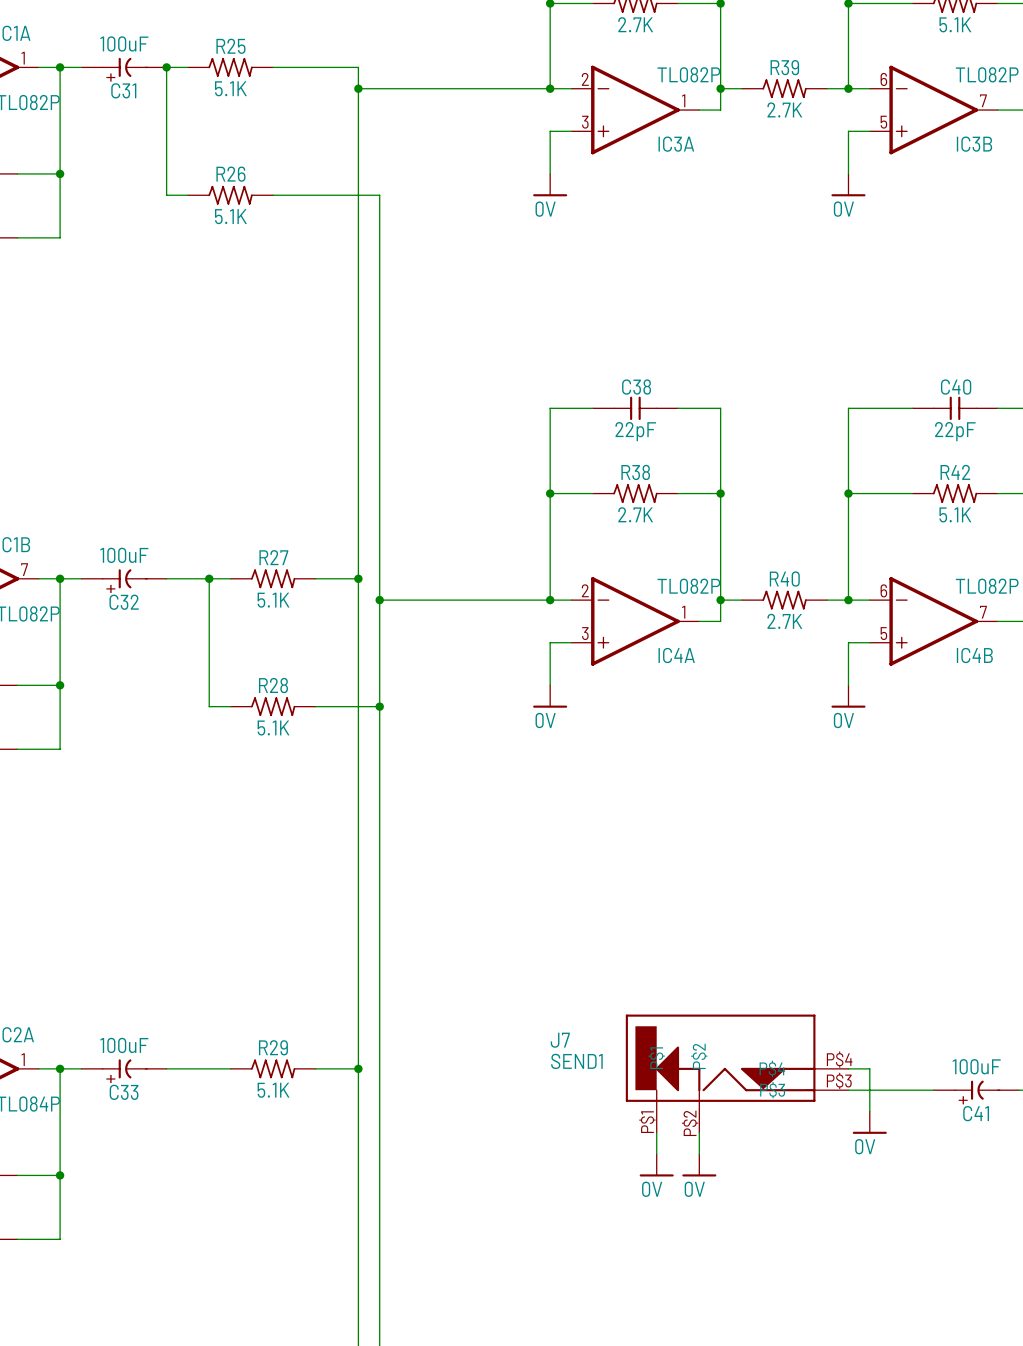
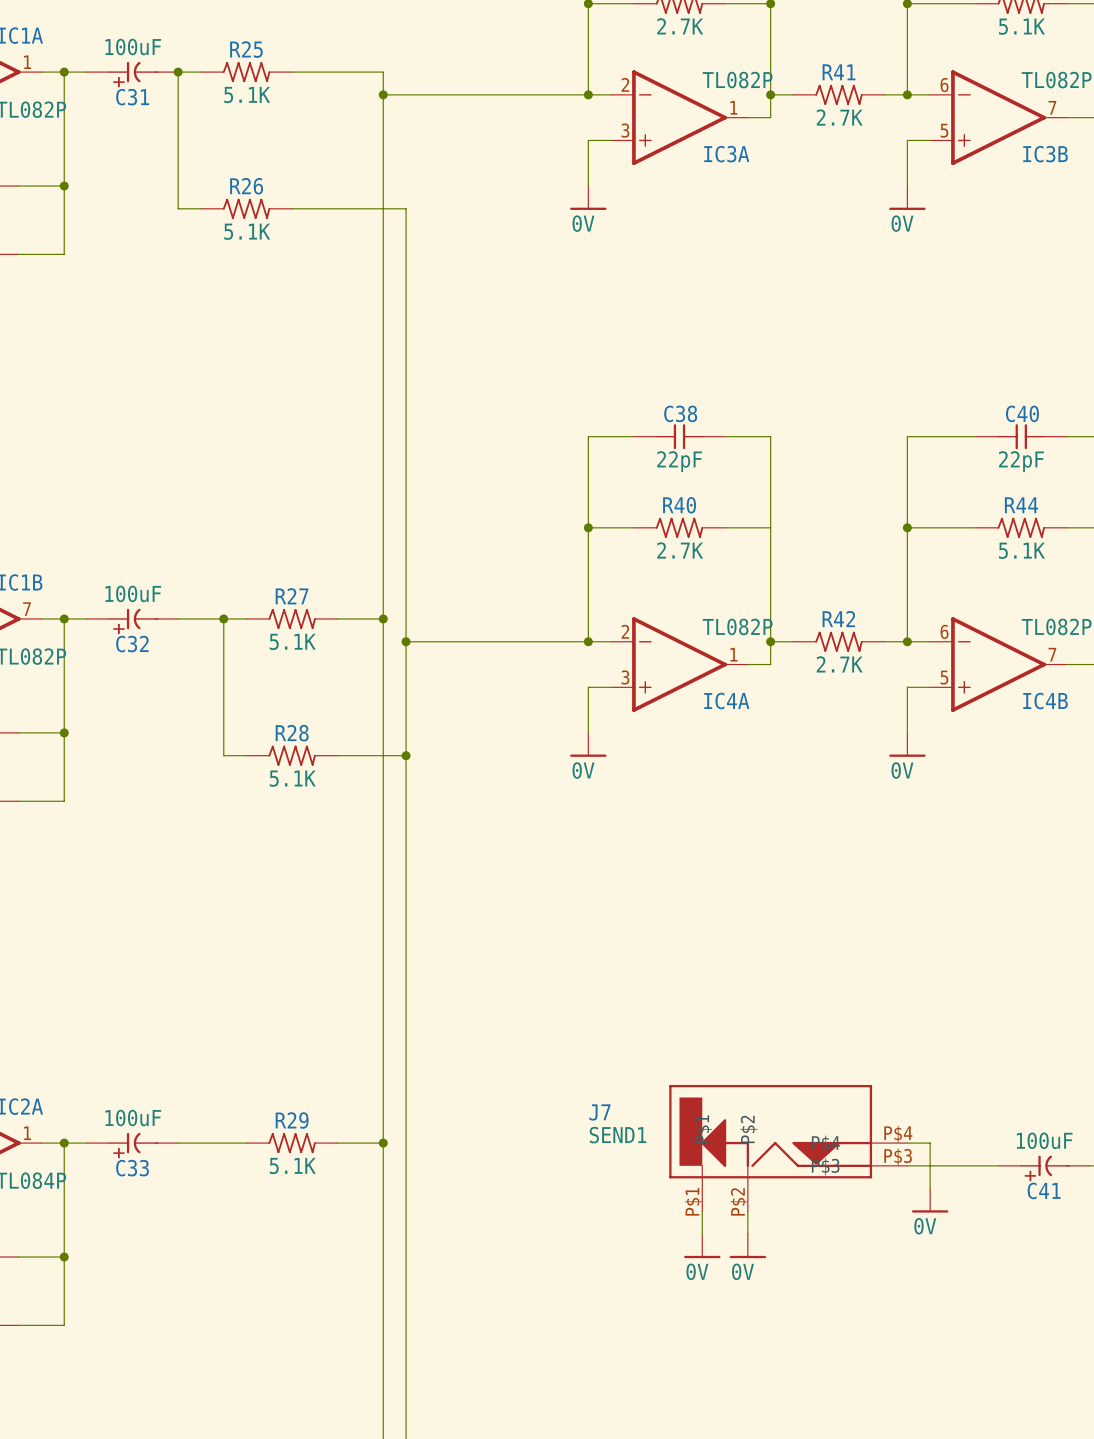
R39 name: R39 (784, 67) -> R41 (839, 72)
R38 name: R38 (635, 472) -> R40 (679, 505)
R42 name: R42 (955, 472) -> R44 (1021, 505)
junction: (720, 493) -> none
R40 name: R40 (784, 579) -> R42 (838, 619)

